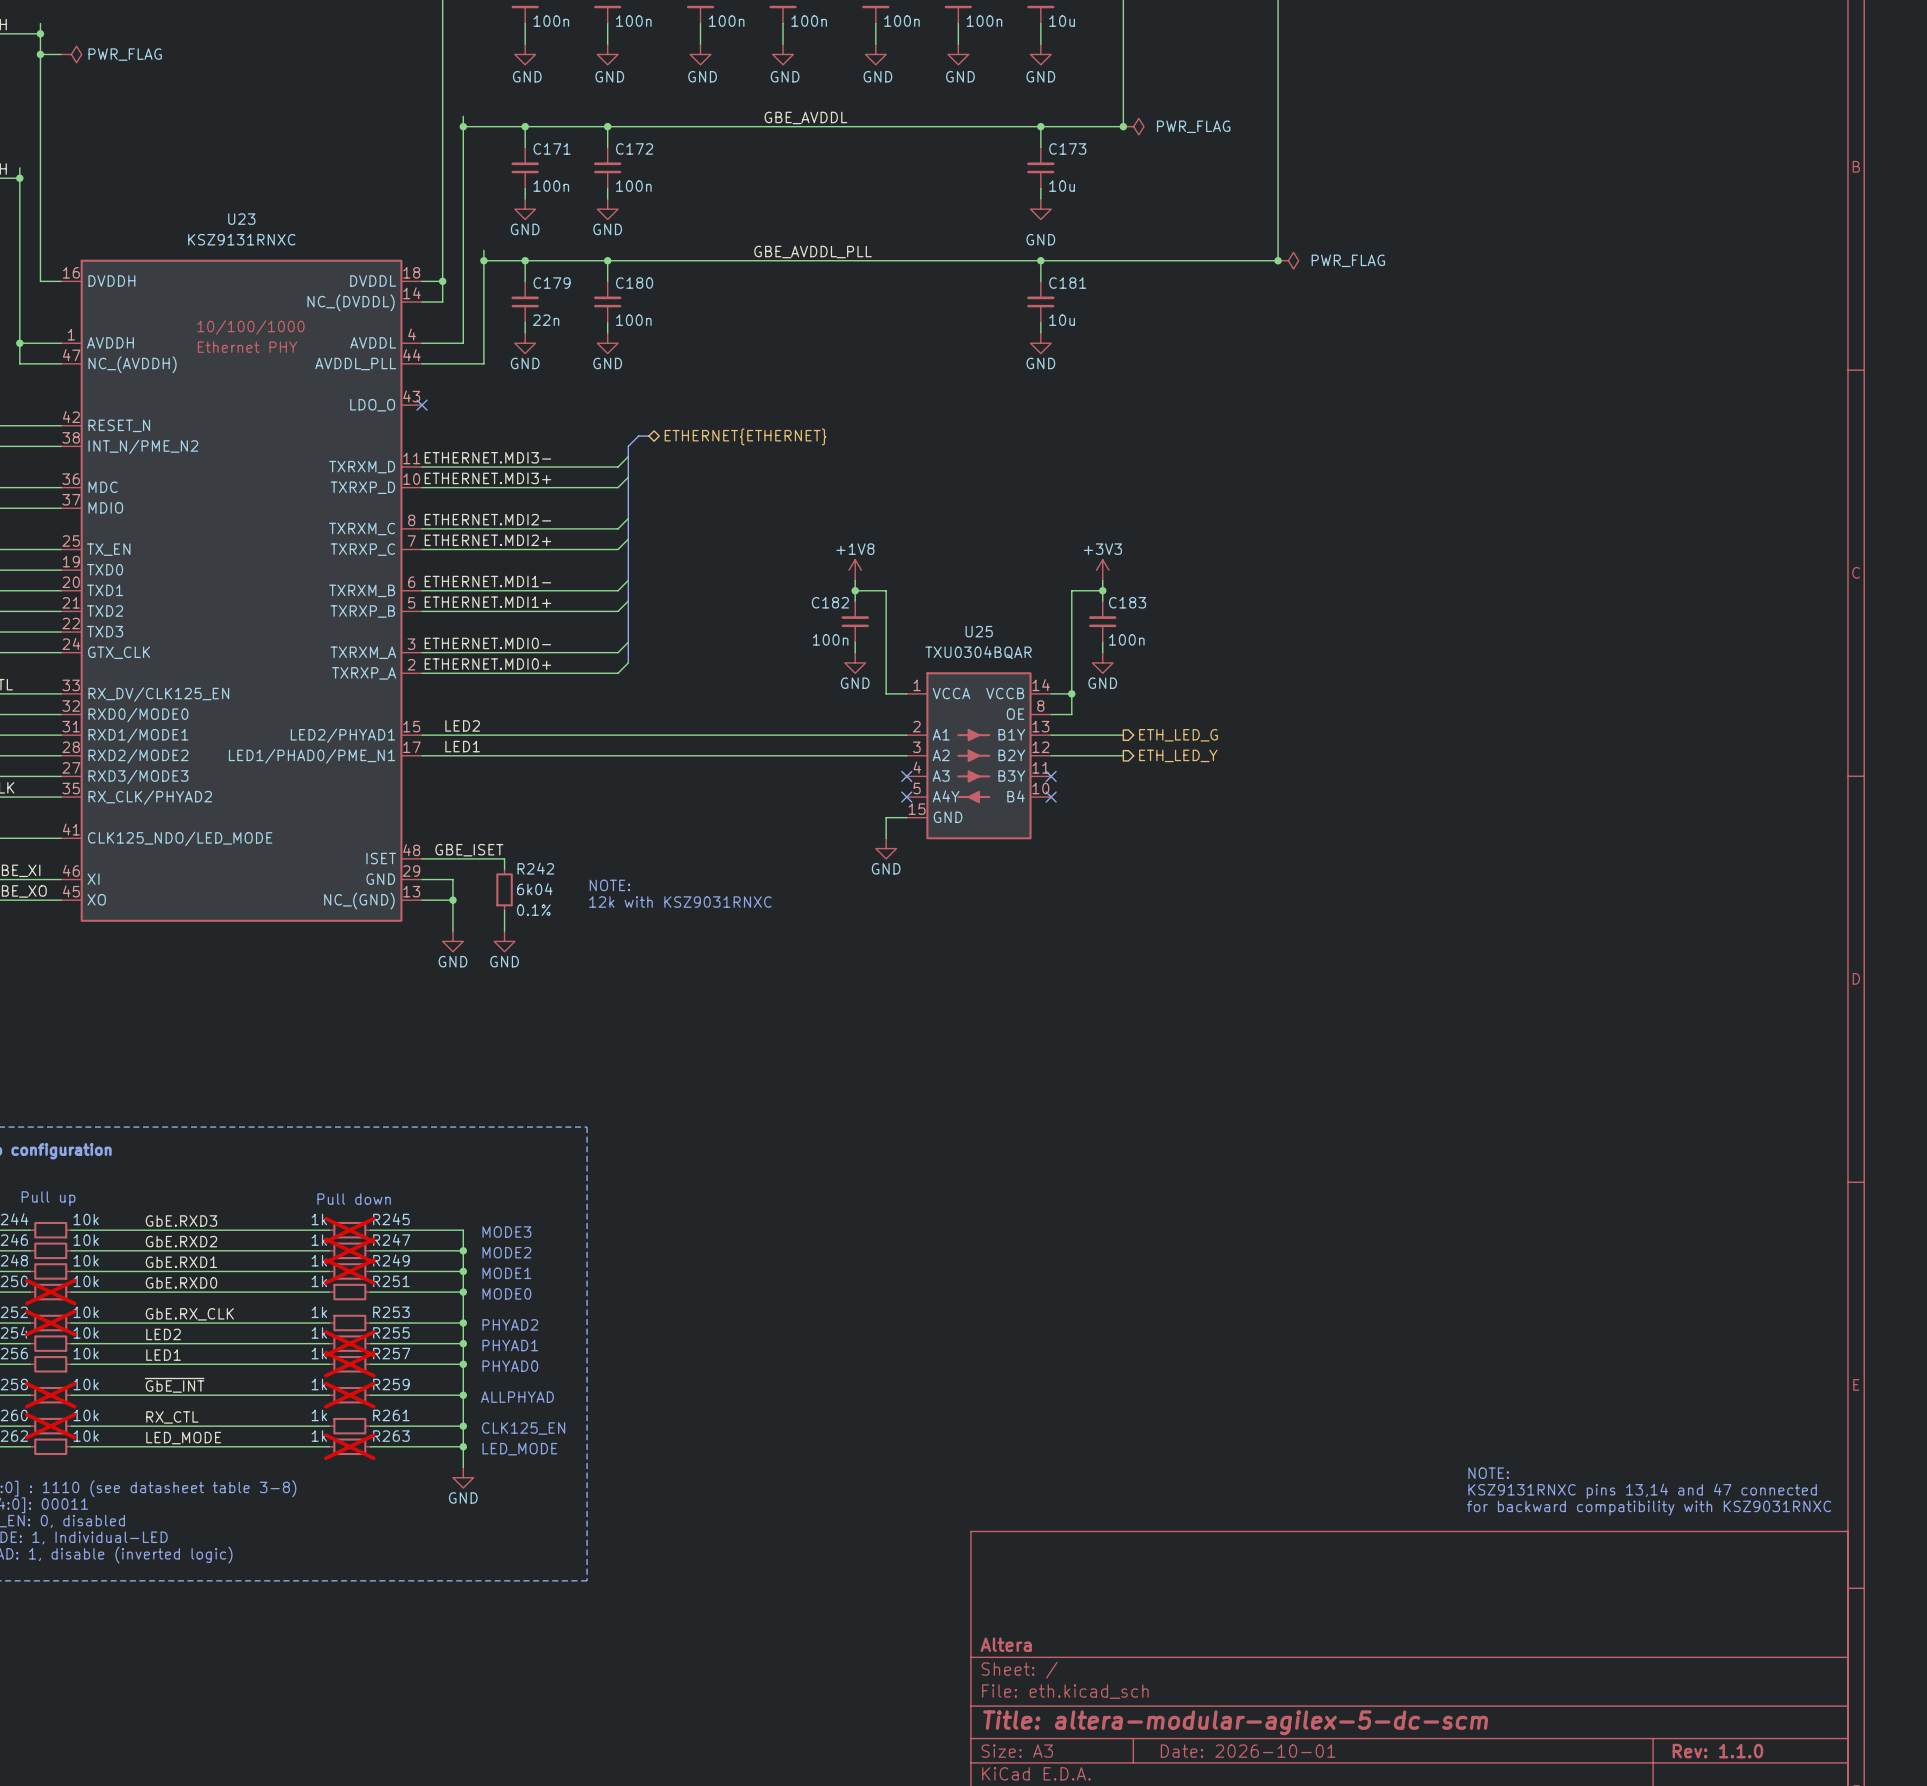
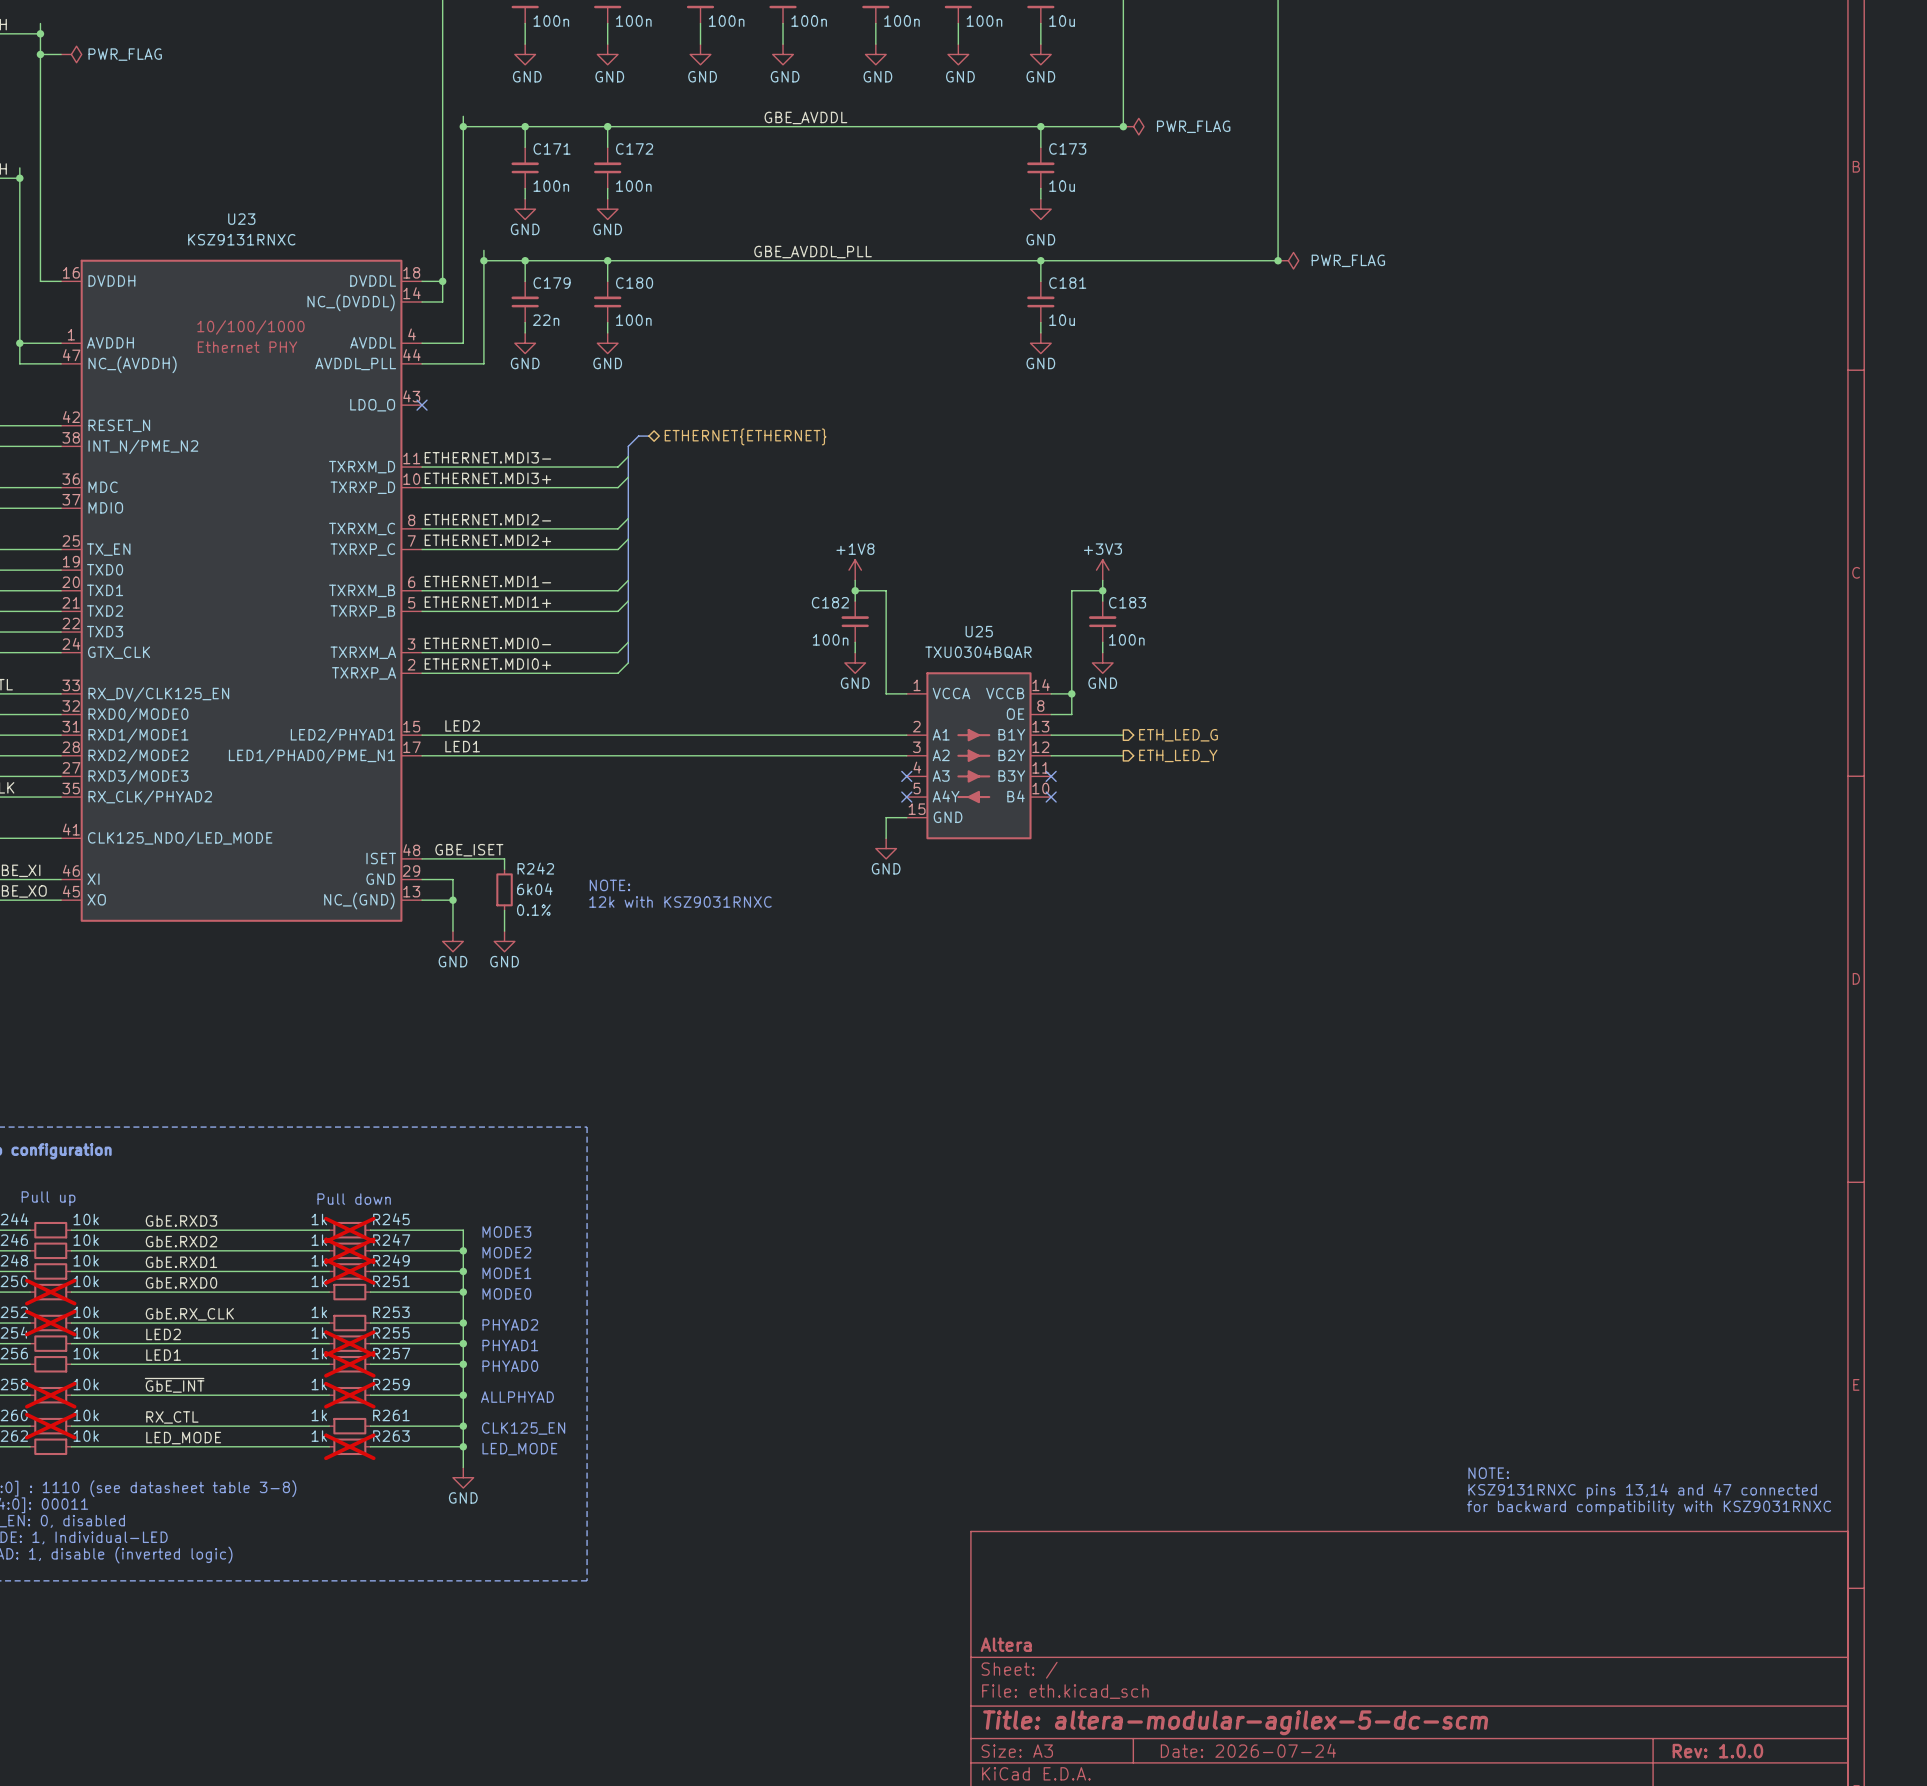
title block: Date: 2026-10-01 (1248, 1751) -> Date: 2026-07-24 (1248, 1750)
title block: Rev: 1.1.0 (1717, 1751) -> Rev: 1.0.0 (1717, 1751)

